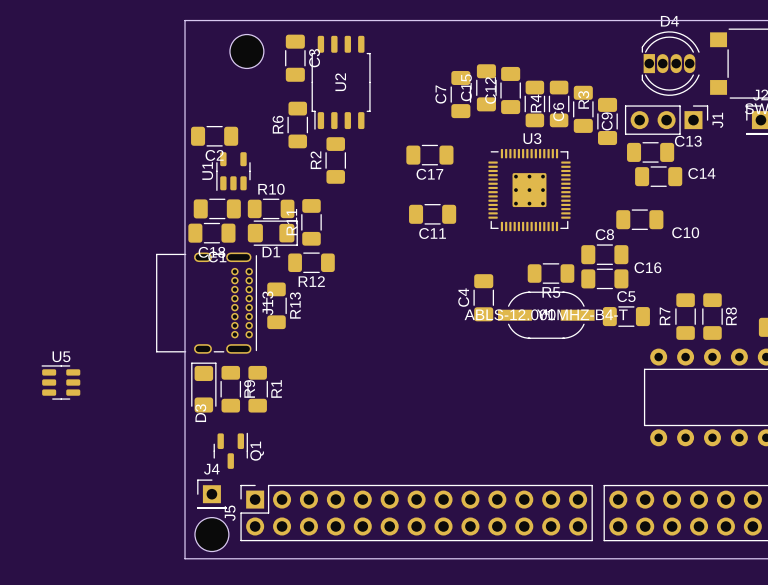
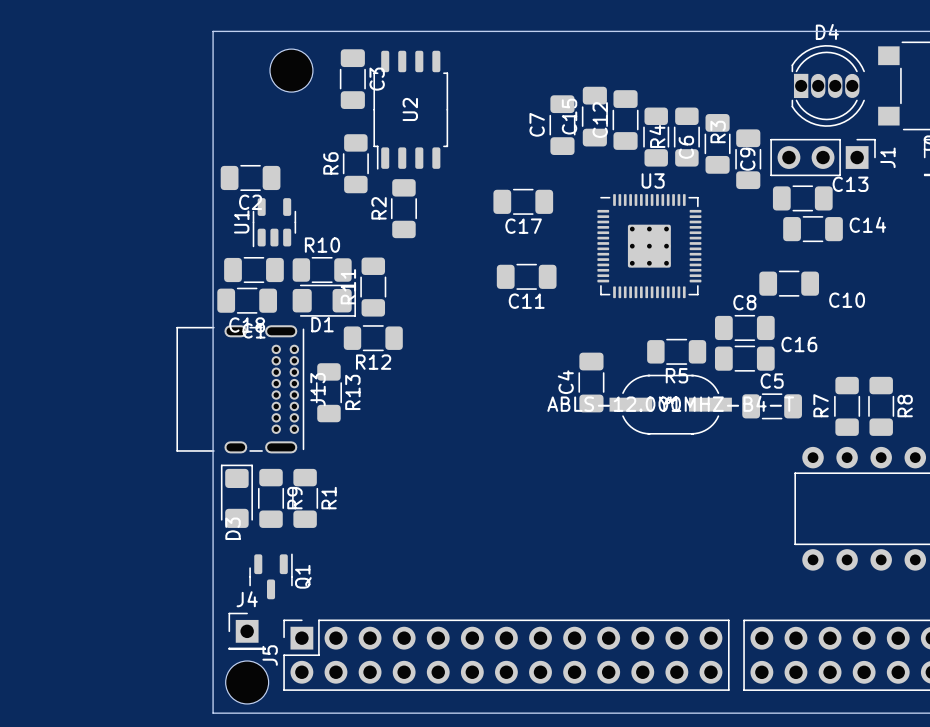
U5: (60, 382) -> none

